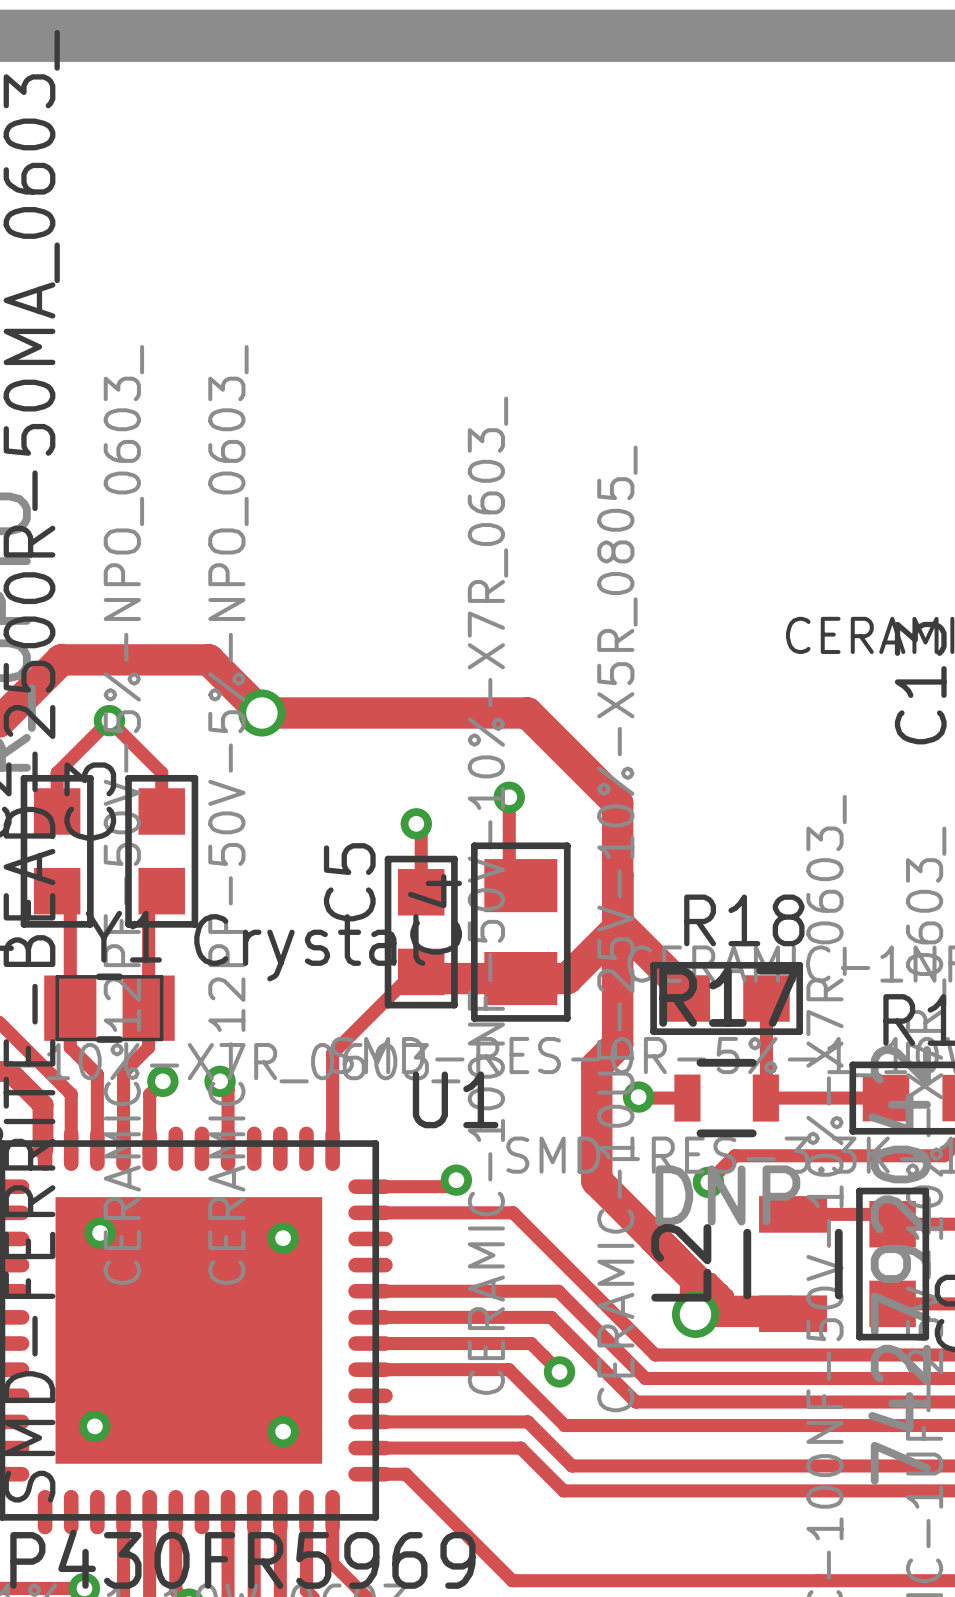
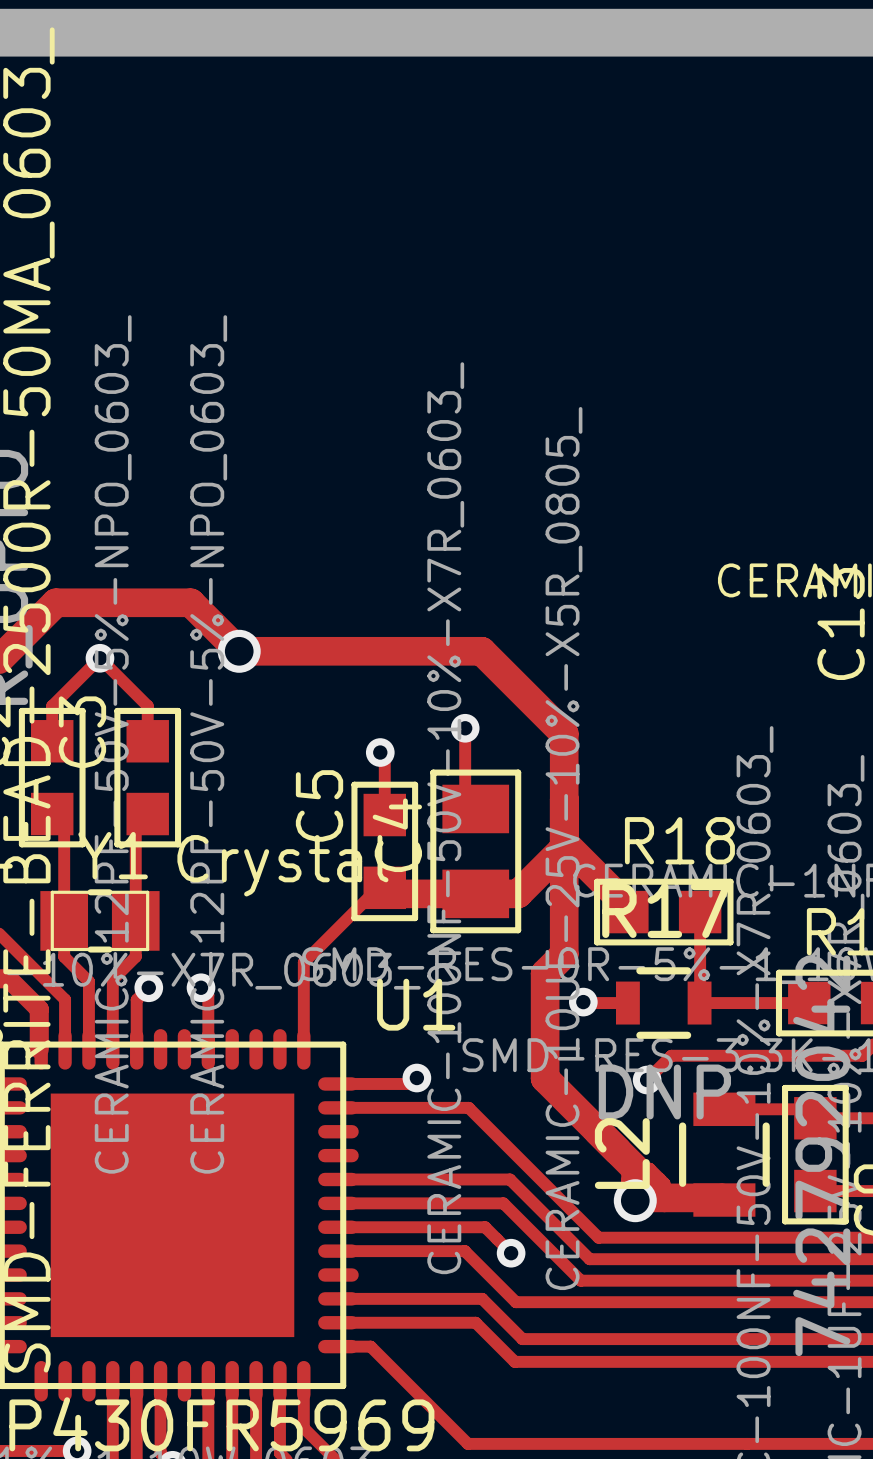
via: (100, 1232) -> none
via: (283, 1238) -> none
via: (94, 1426) -> none
via: (283, 1431) -> none

